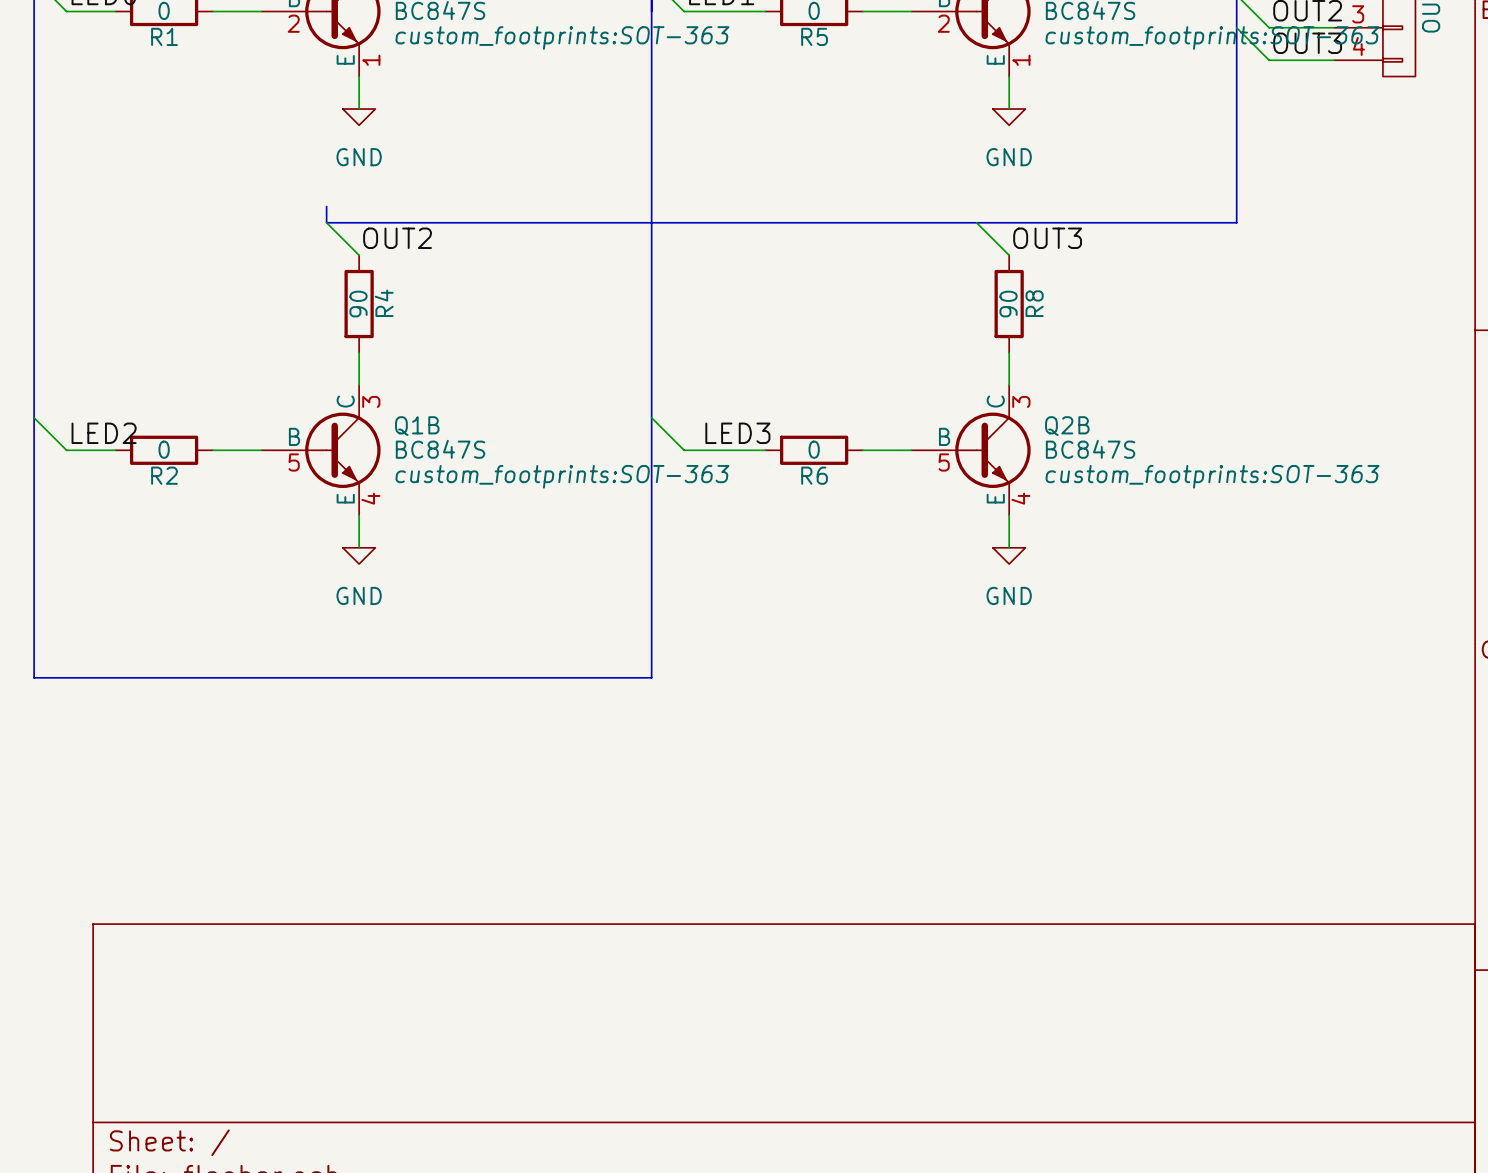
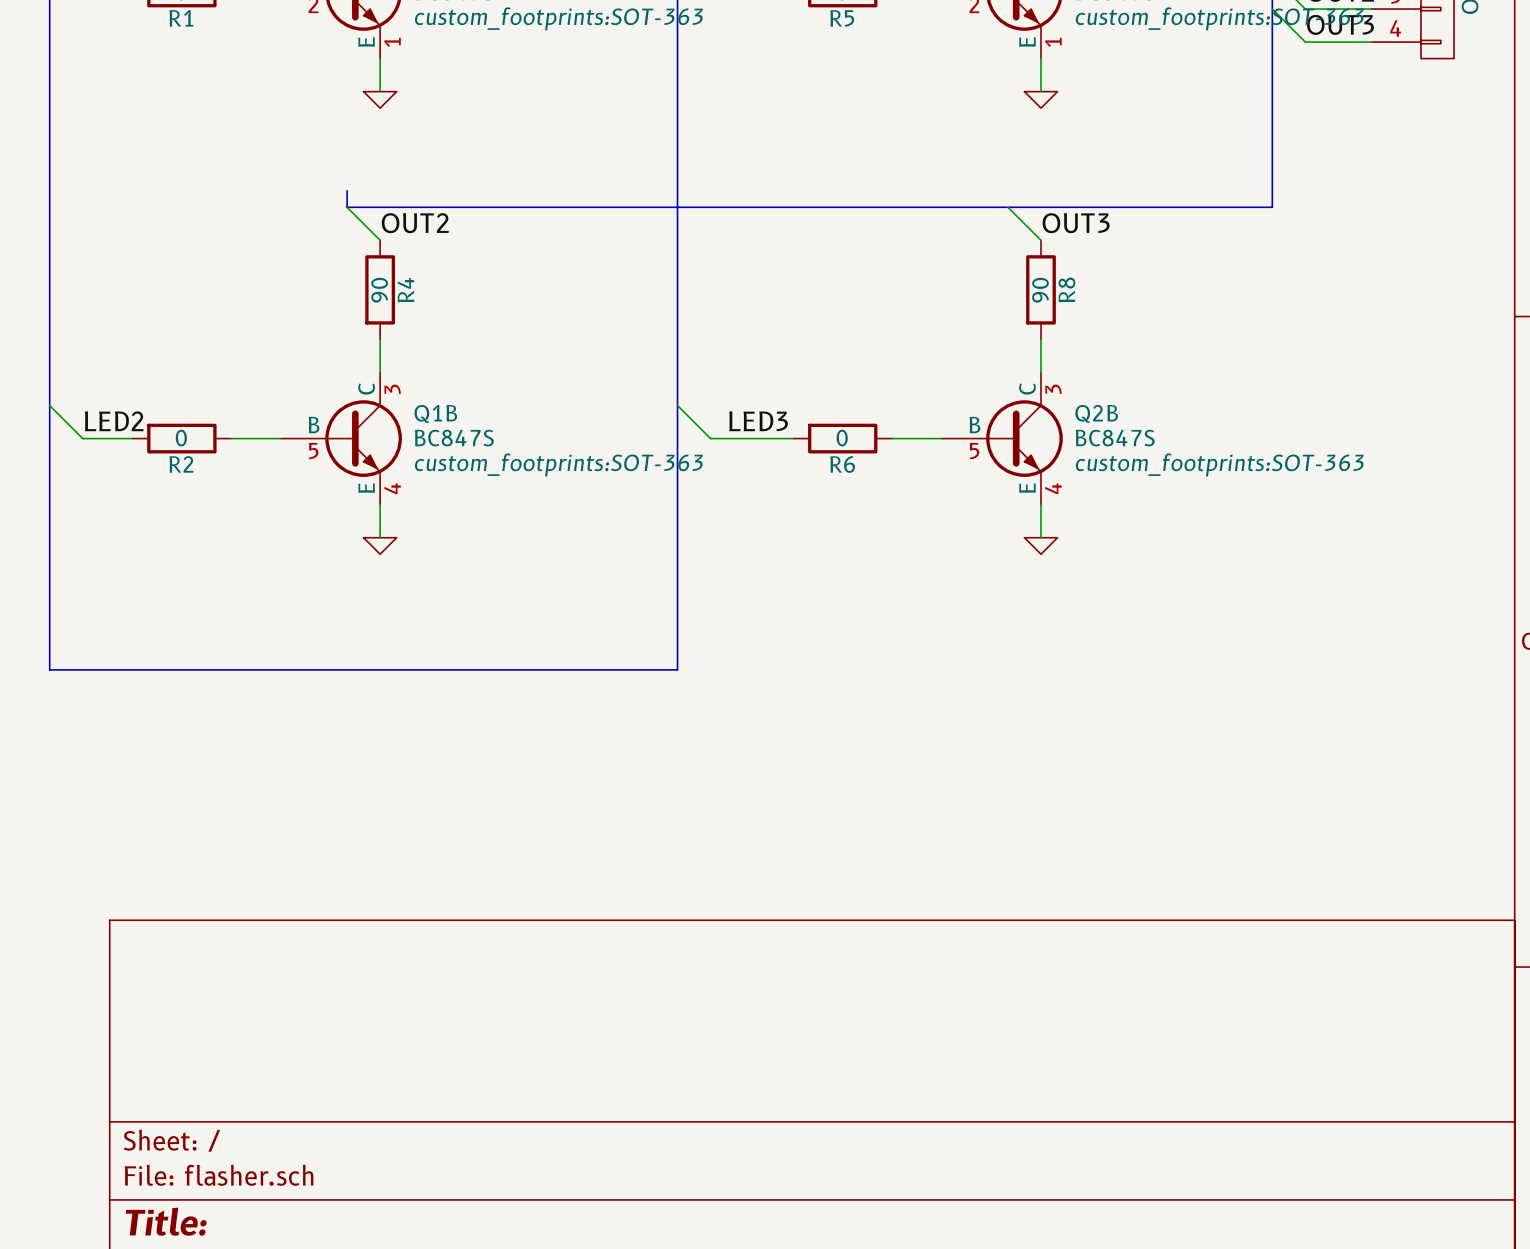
power symbol text: GND (359, 157) -> none
power symbol text: GND (1009, 157) -> none
power symbol text: GND (359, 595) -> none
power symbol text: GND (1009, 595) -> none

